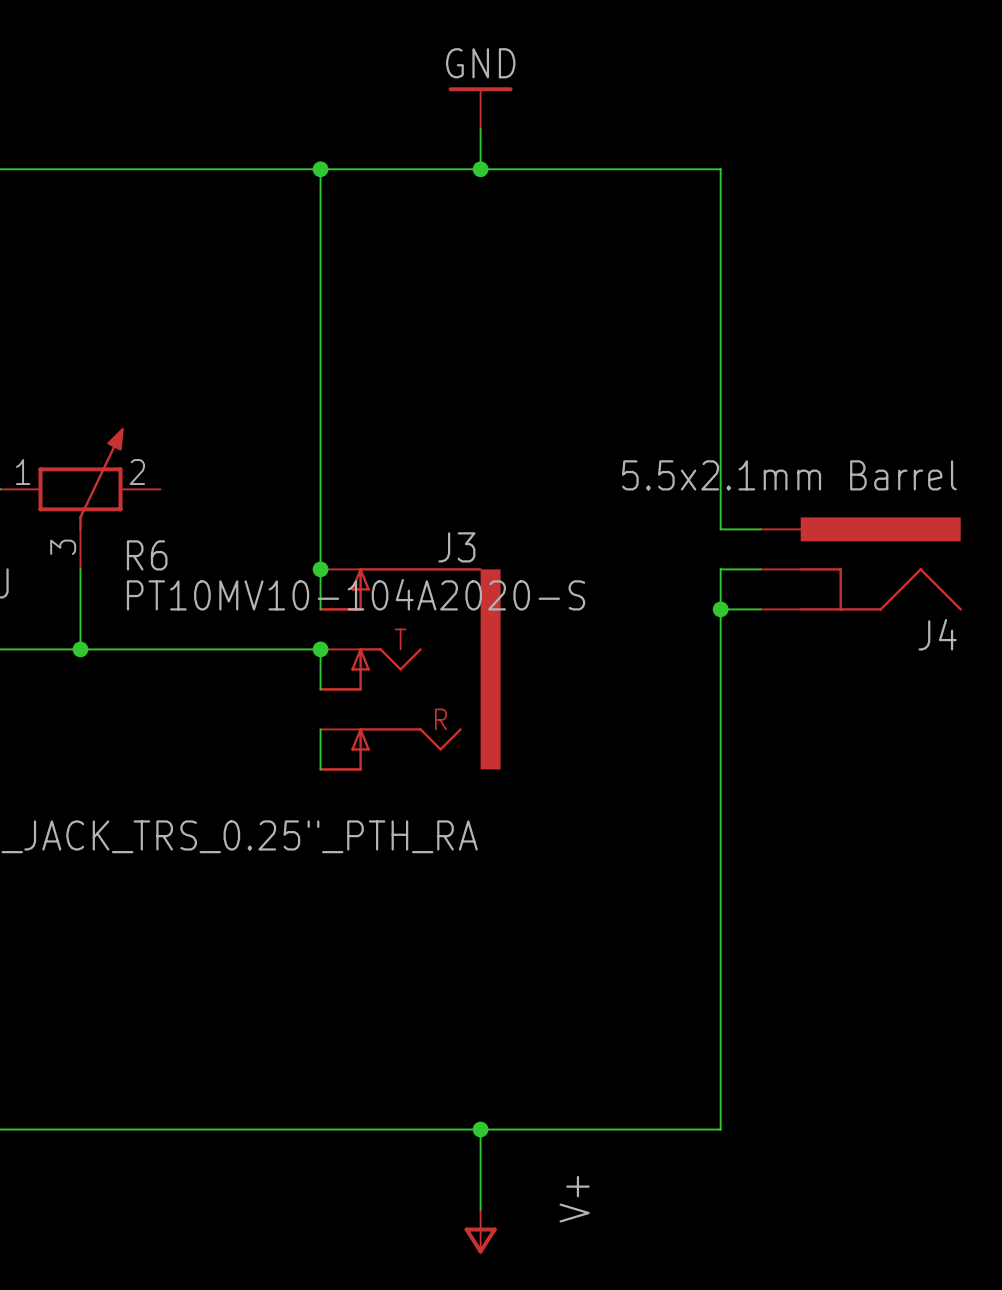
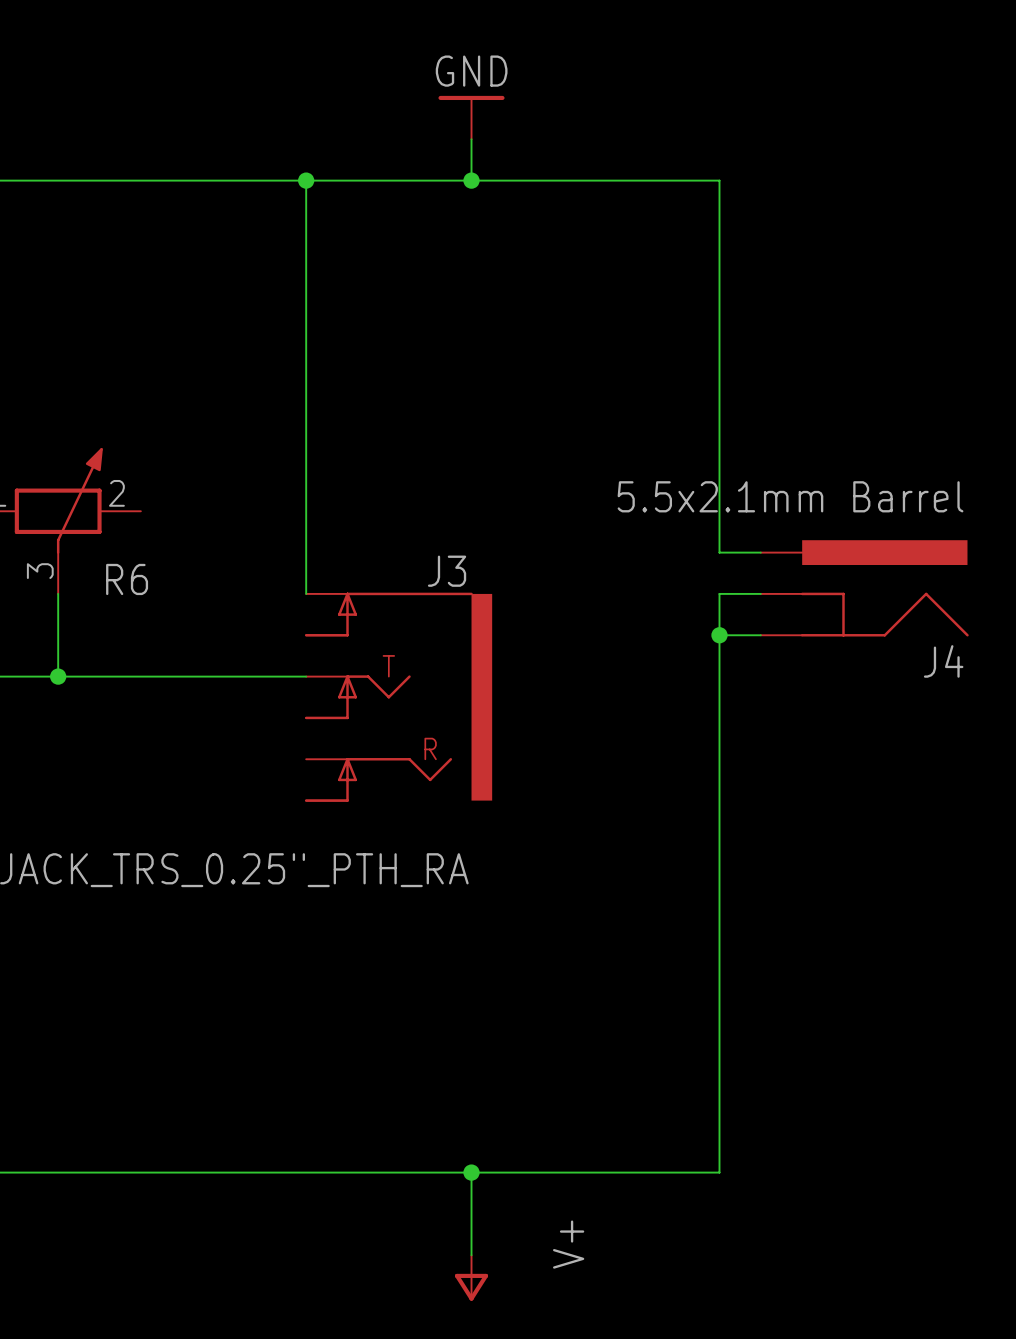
wire: (320, 569) (320, 609) -> none
junction: (320, 569) -> none
R6 value: PT10MV10-104A2020-S (356, 594) -> none
wire: (320, 649) (320, 689) -> none
junction: (320, 649) -> none
wire: (320, 729) (320, 769) -> none

